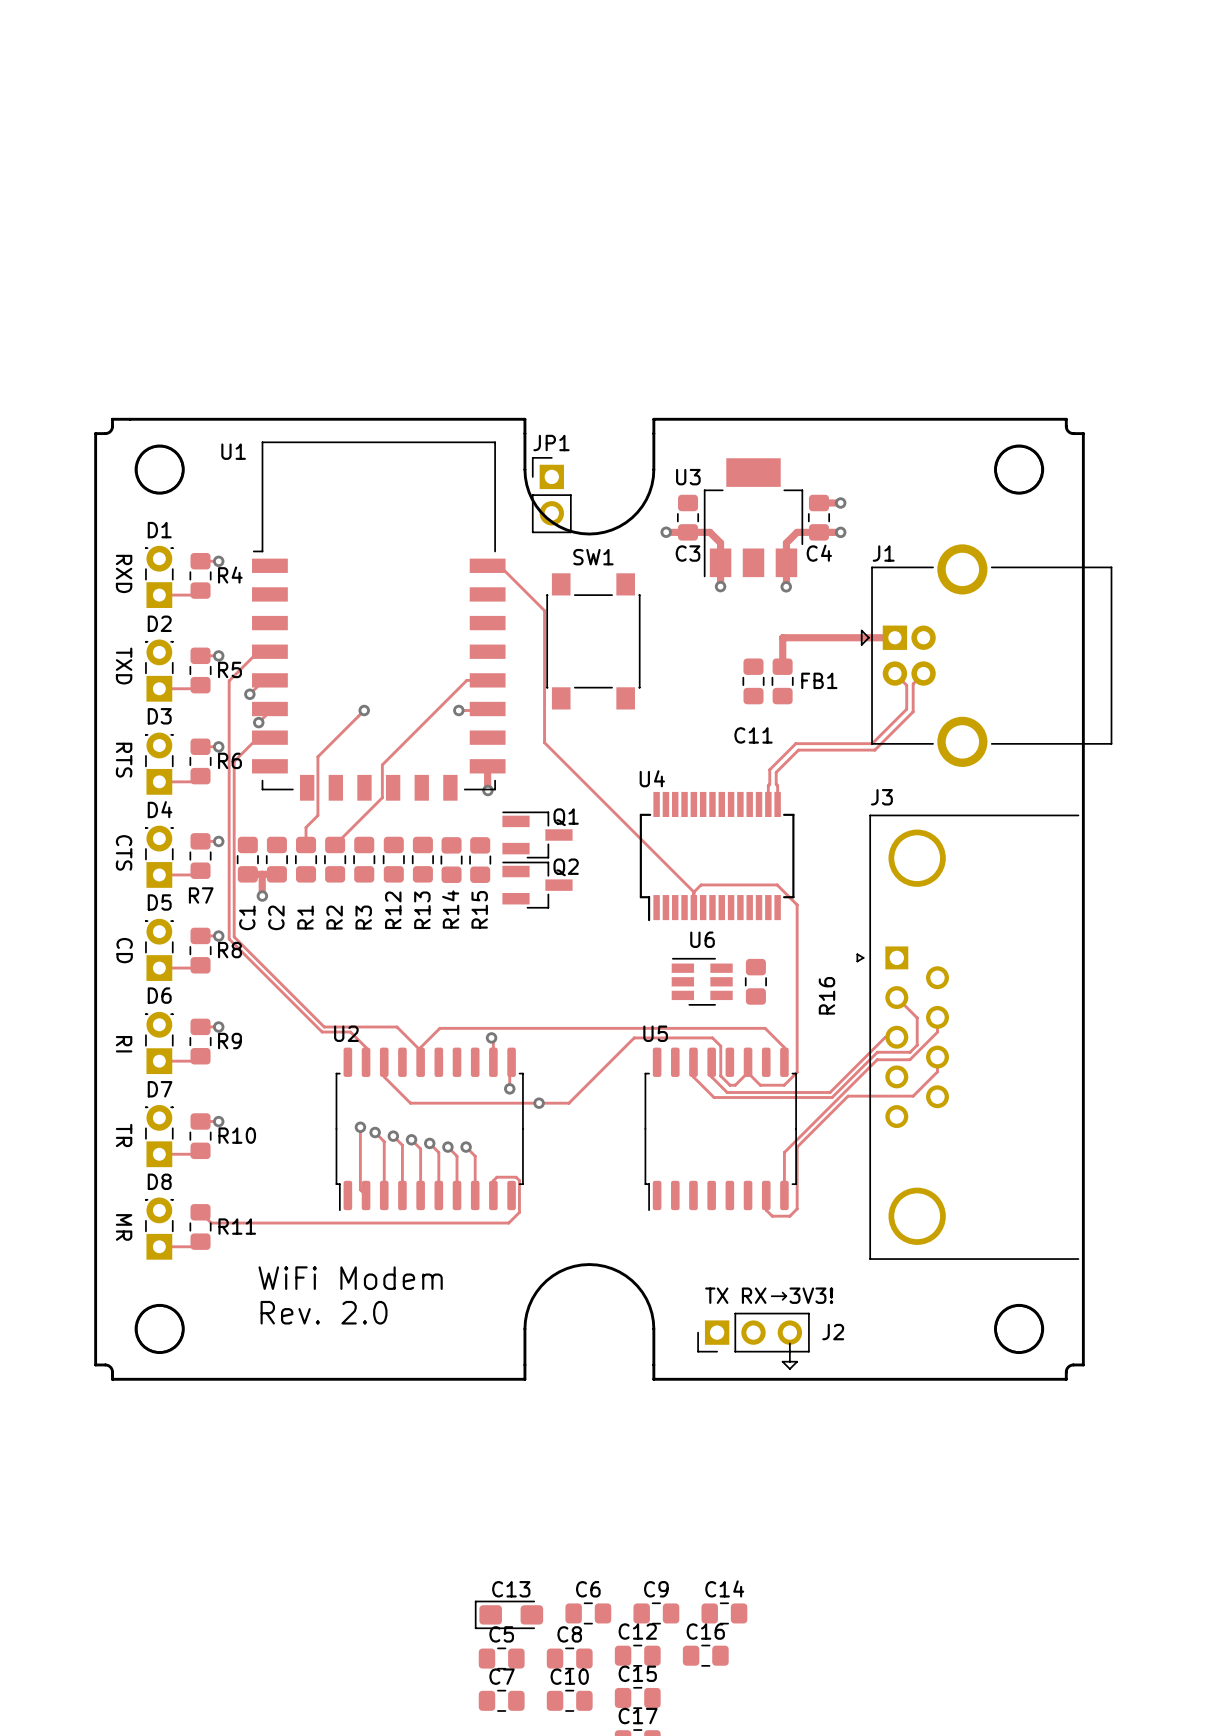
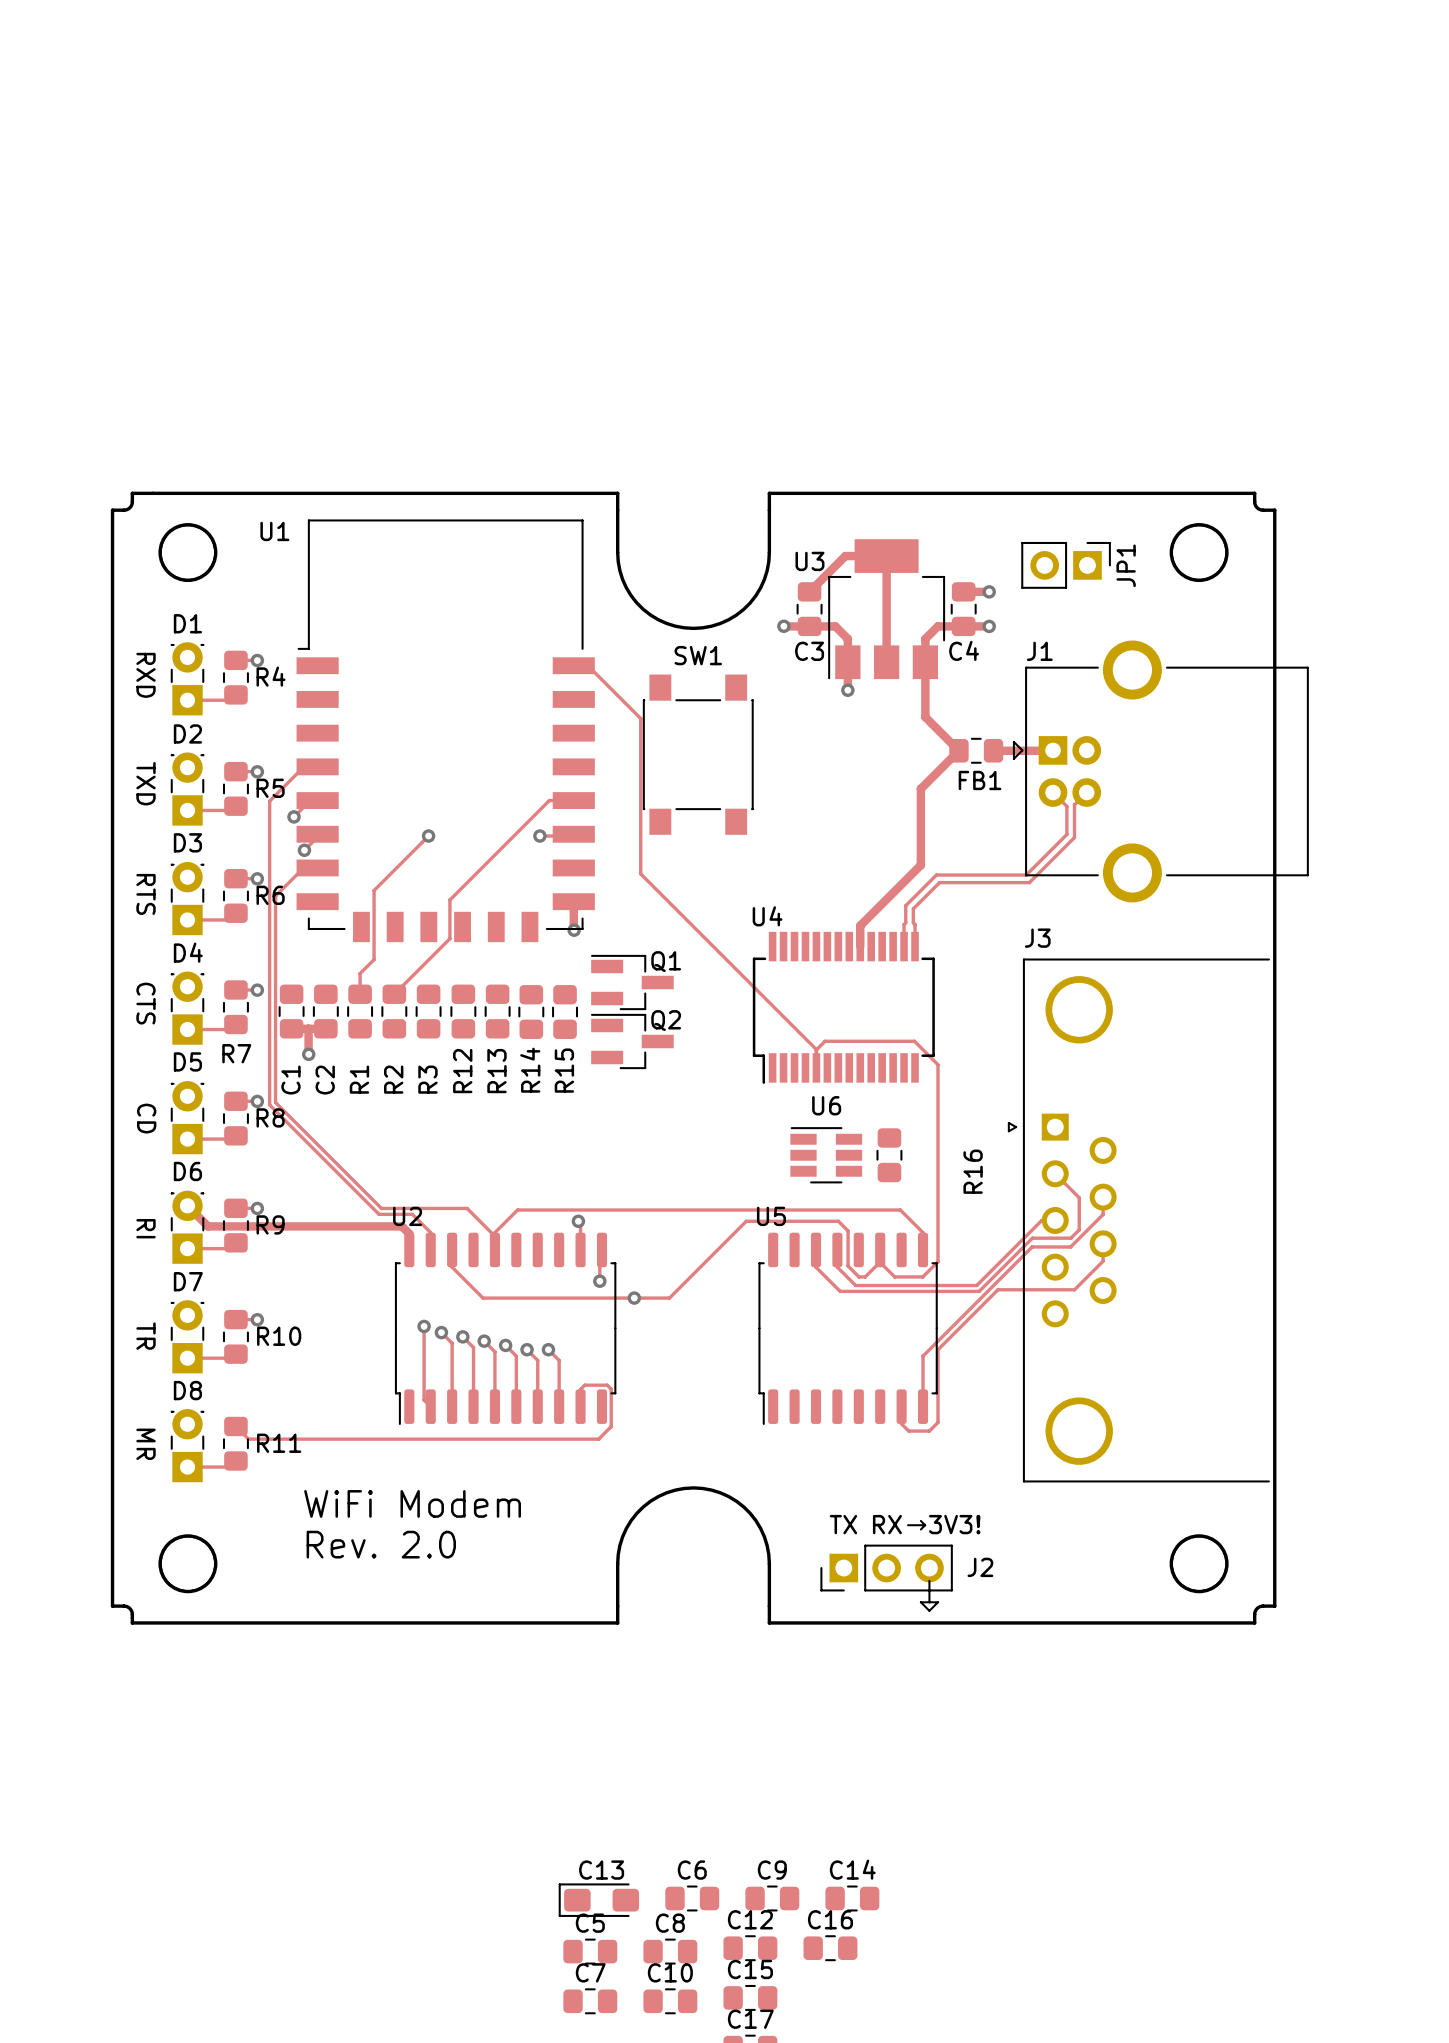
JP1 rotation: 0° (551, 495) -> 90° clockwise (1066, 565)
JP1 position: (551, 495) -> (1066, 565)
track: none -> (809, 591) (845, 556) (886, 556) (886, 662)
track: none -> (925, 690) (925, 717) (958, 750) (920, 788) (920, 865) (860, 925) (860, 946)
via: (786, 586) -> none
track: (894, 637) (782, 637) (782, 666) -> (1053, 750) (993, 750)
C11: (753, 681) -> none
FB1 rotation: 0° (782, 681) -> 90° clockwise (976, 750)
FB1 position: (782, 681) -> (976, 750)
track: none -> (187, 1205) (208, 1226) (401, 1226) (409, 1233) (409, 1249)

